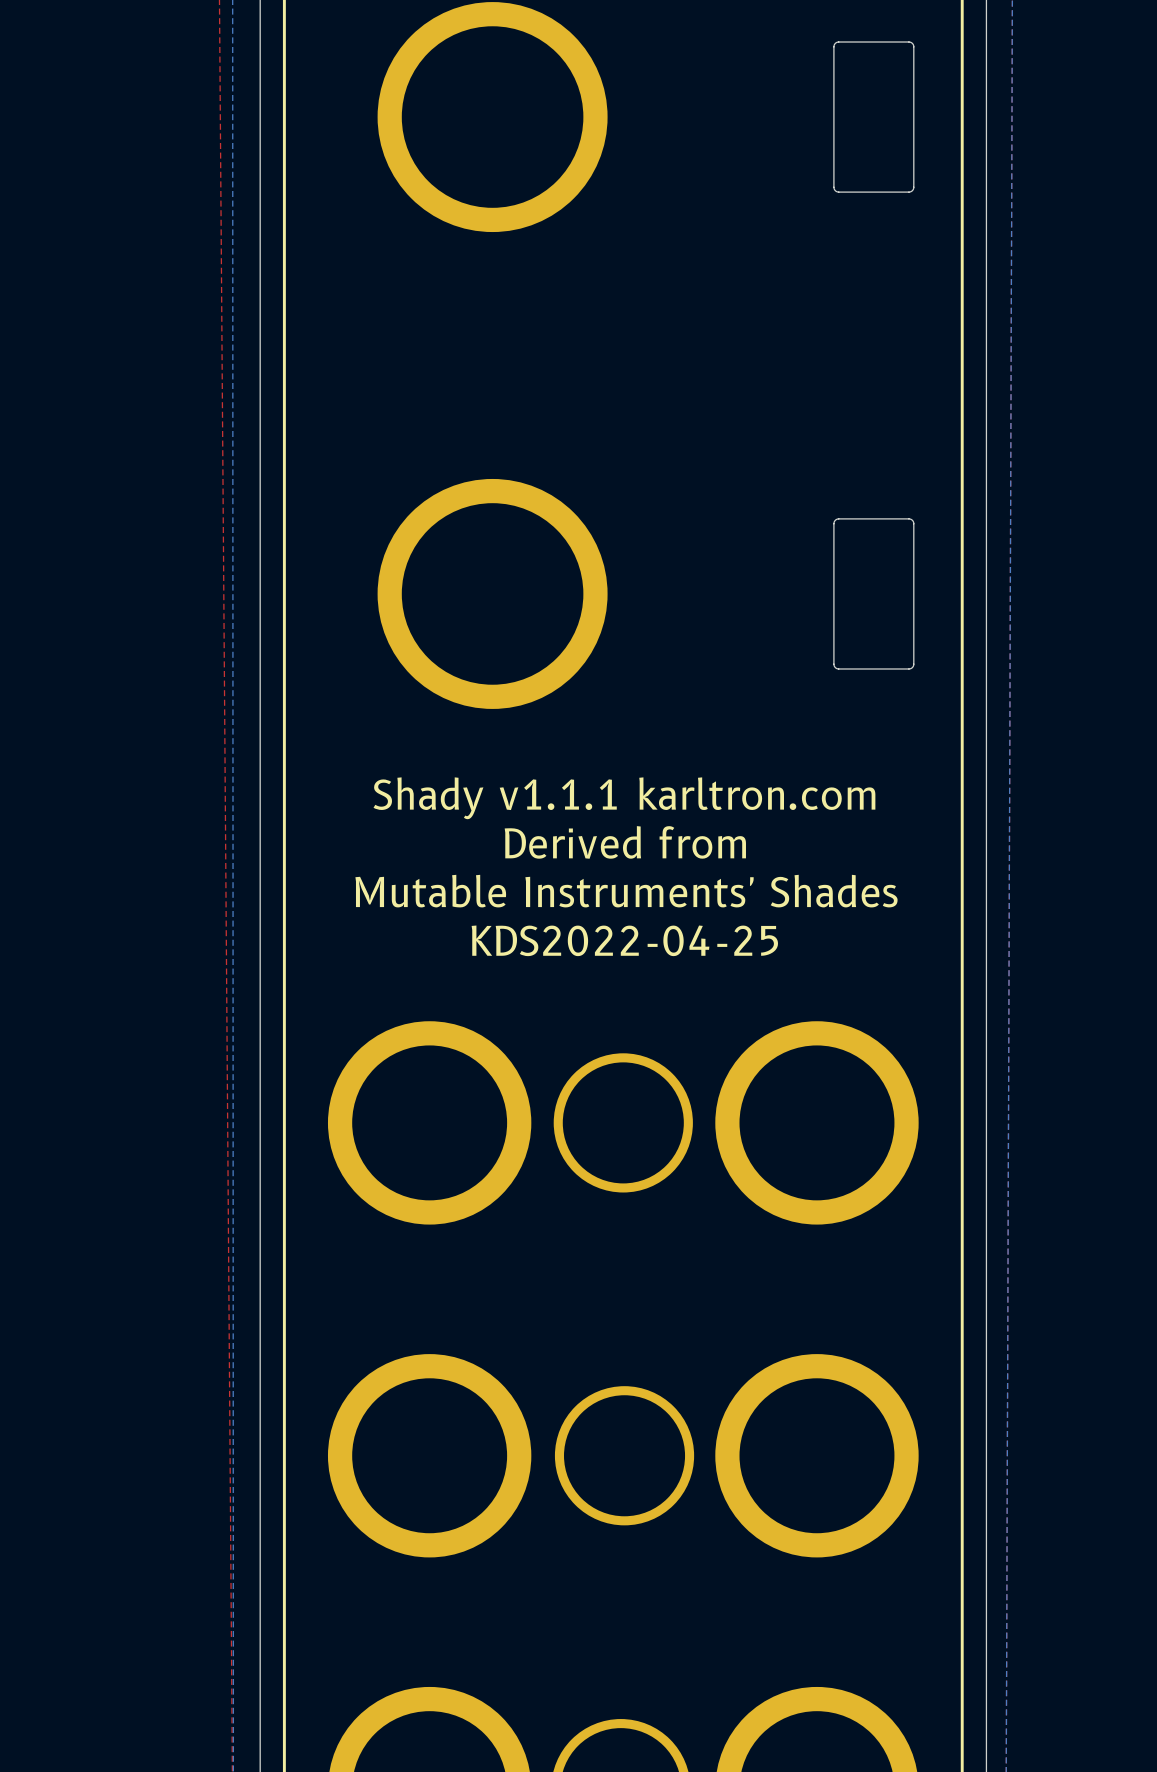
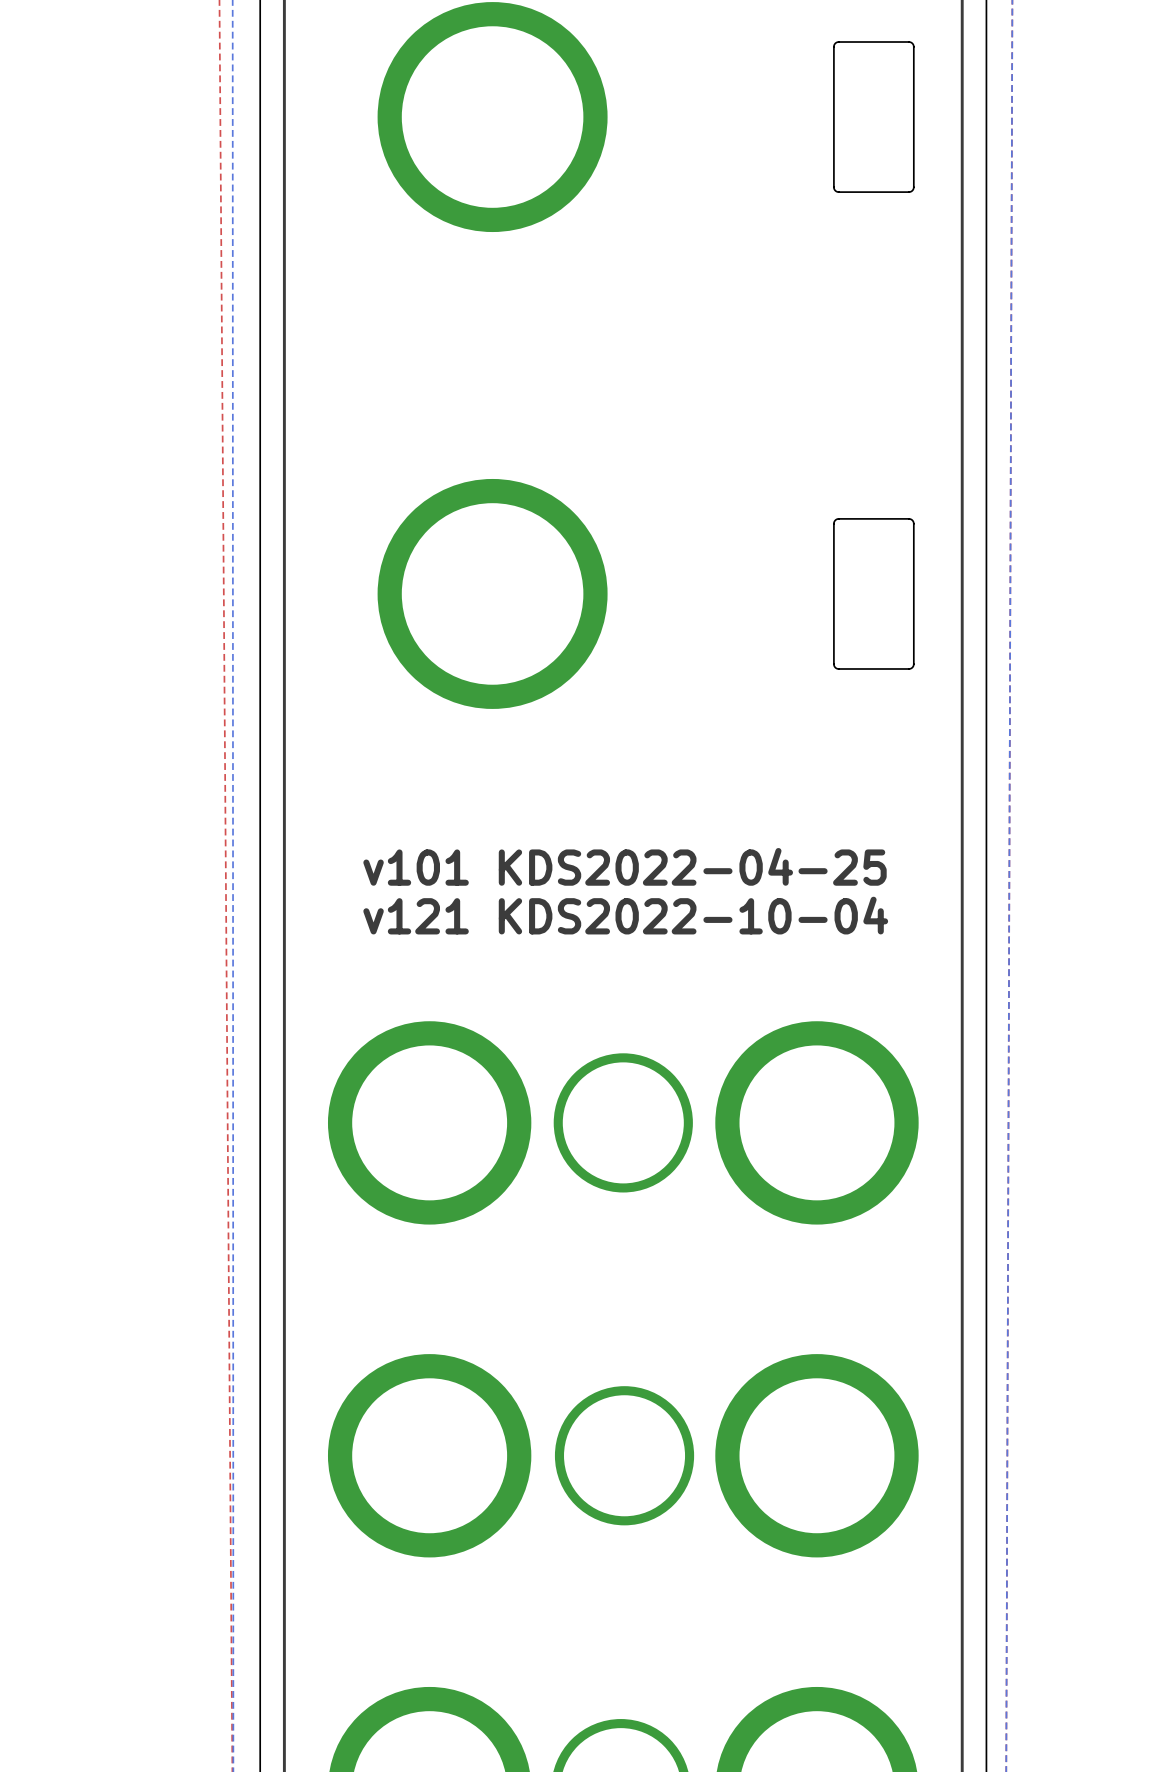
text: Shady v1.1.1 karltron.com (624, 798) -> none
text: Derived from (625, 842) -> none
text: none -> v101 KDS2022-04-25 (625, 866)
text: Mutable Instruments' Shades (626, 891) -> none
text: KDS2022-04-25 (624, 940) -> v121 KDS2022-10-04 (625, 915)

